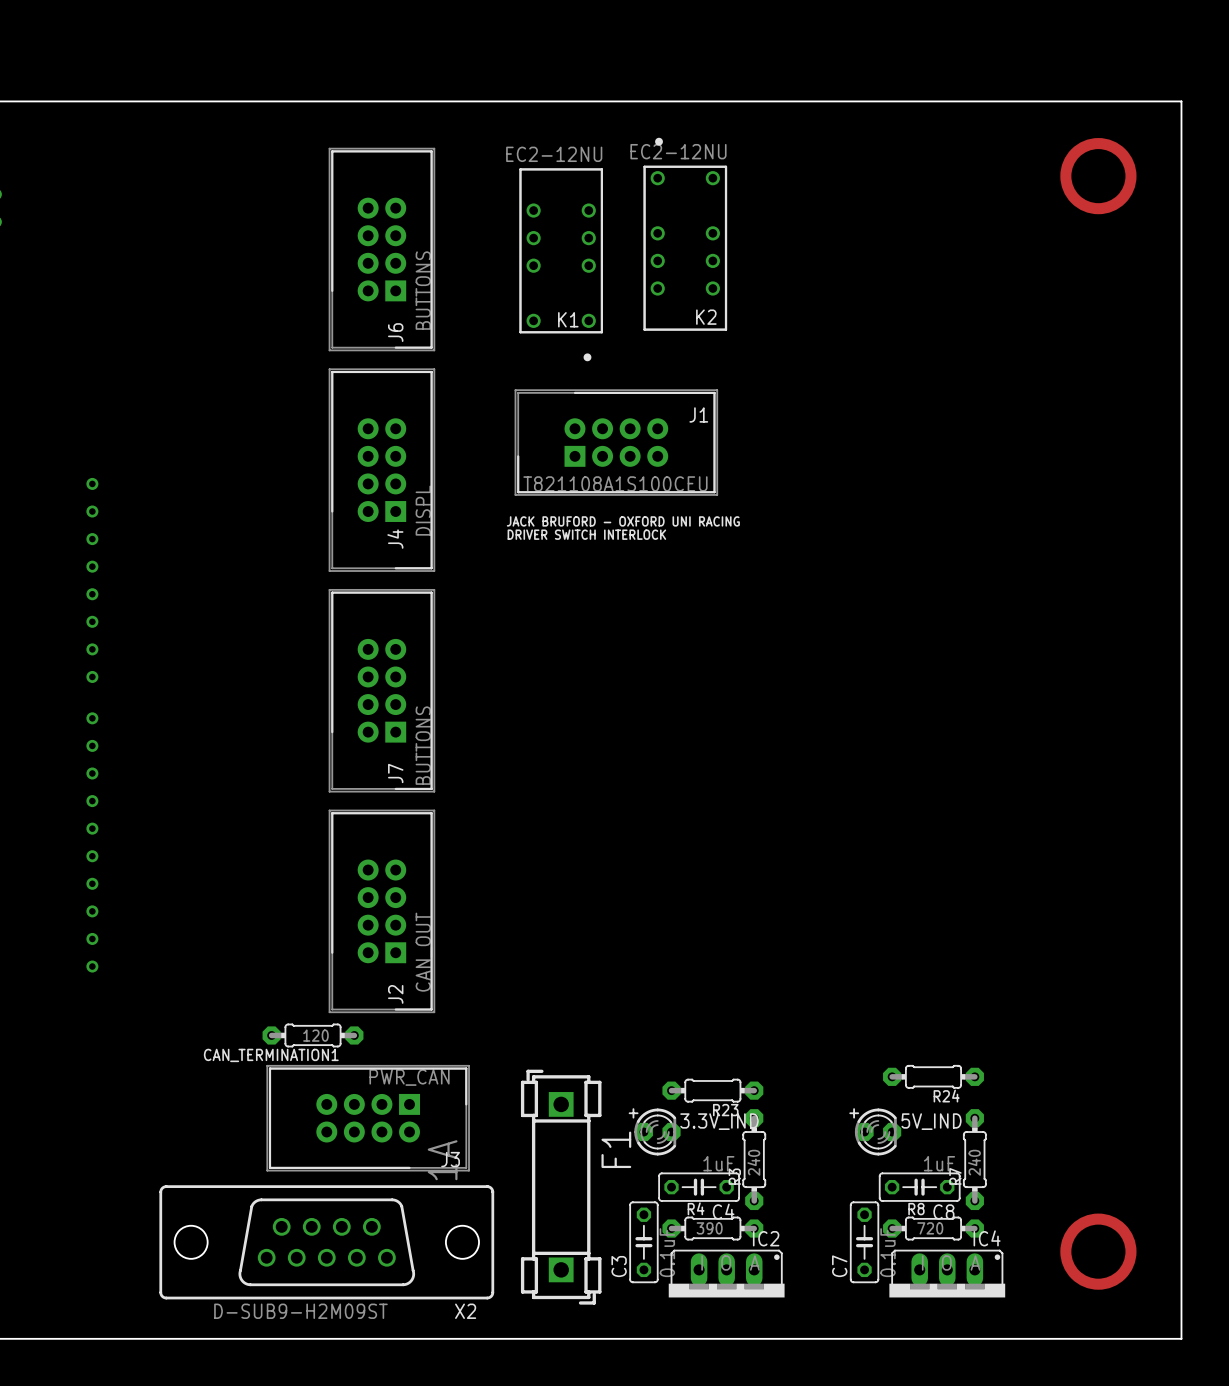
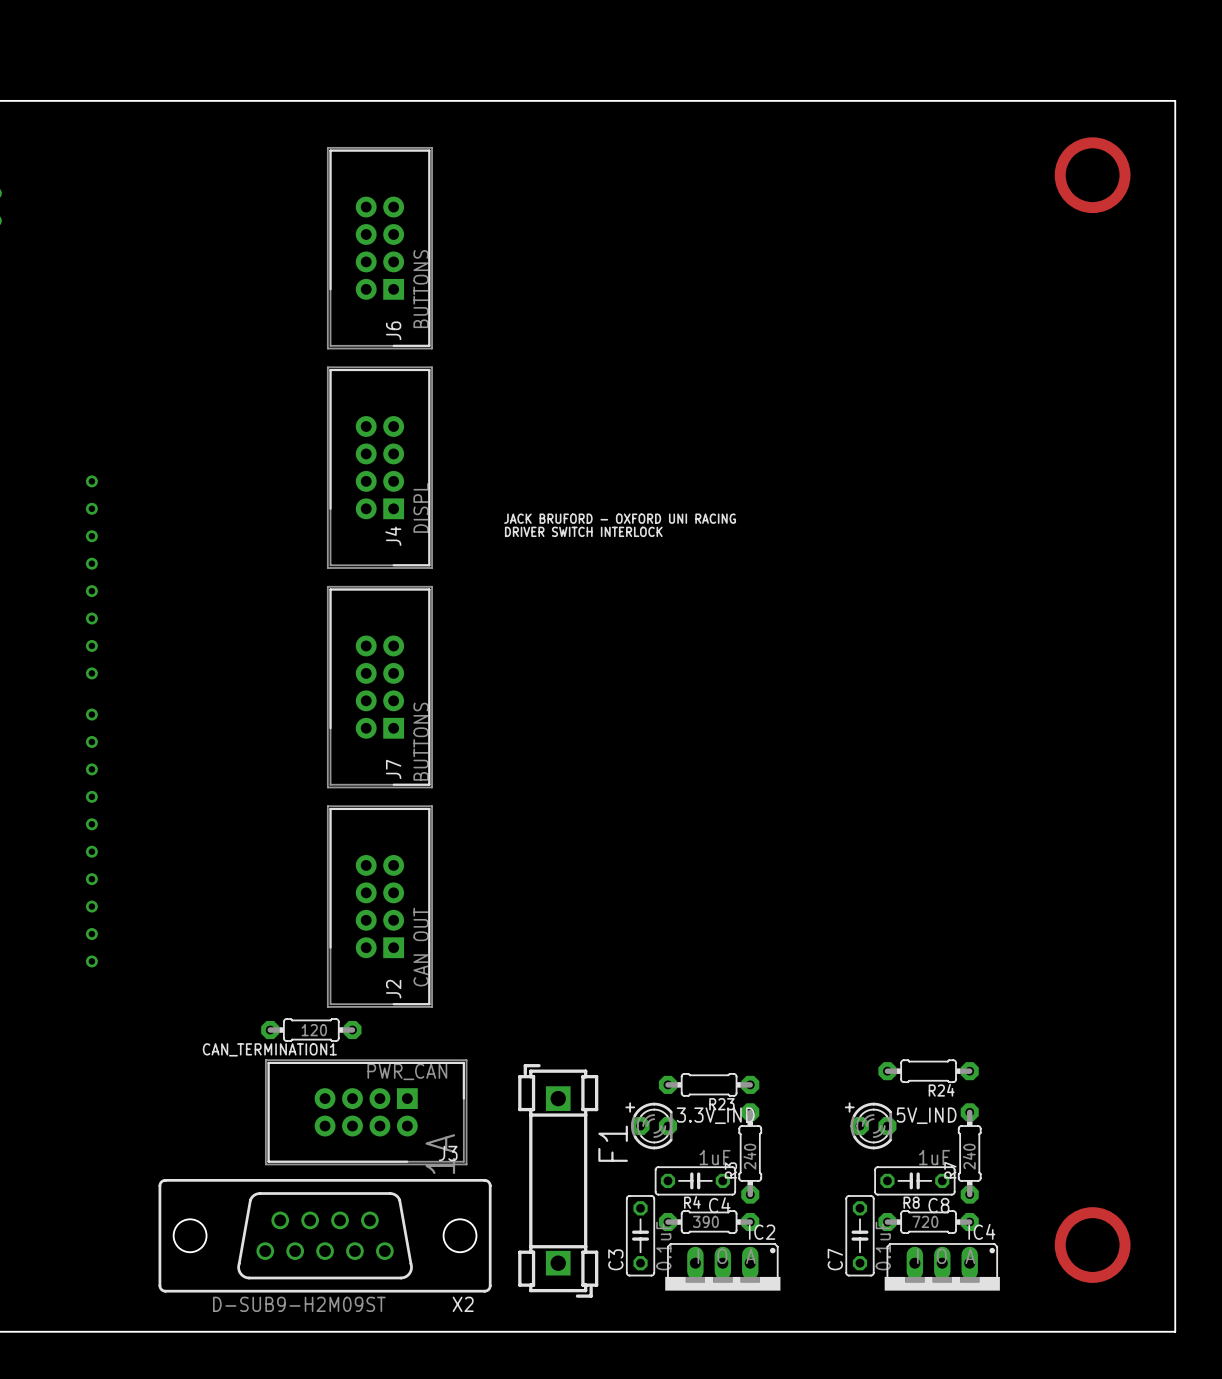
K2: EC2-12NU (685, 234) -> none
K1: EC2-12NU (561, 264) -> none
J1: T821108A1S100CEU (616, 442) -> none

